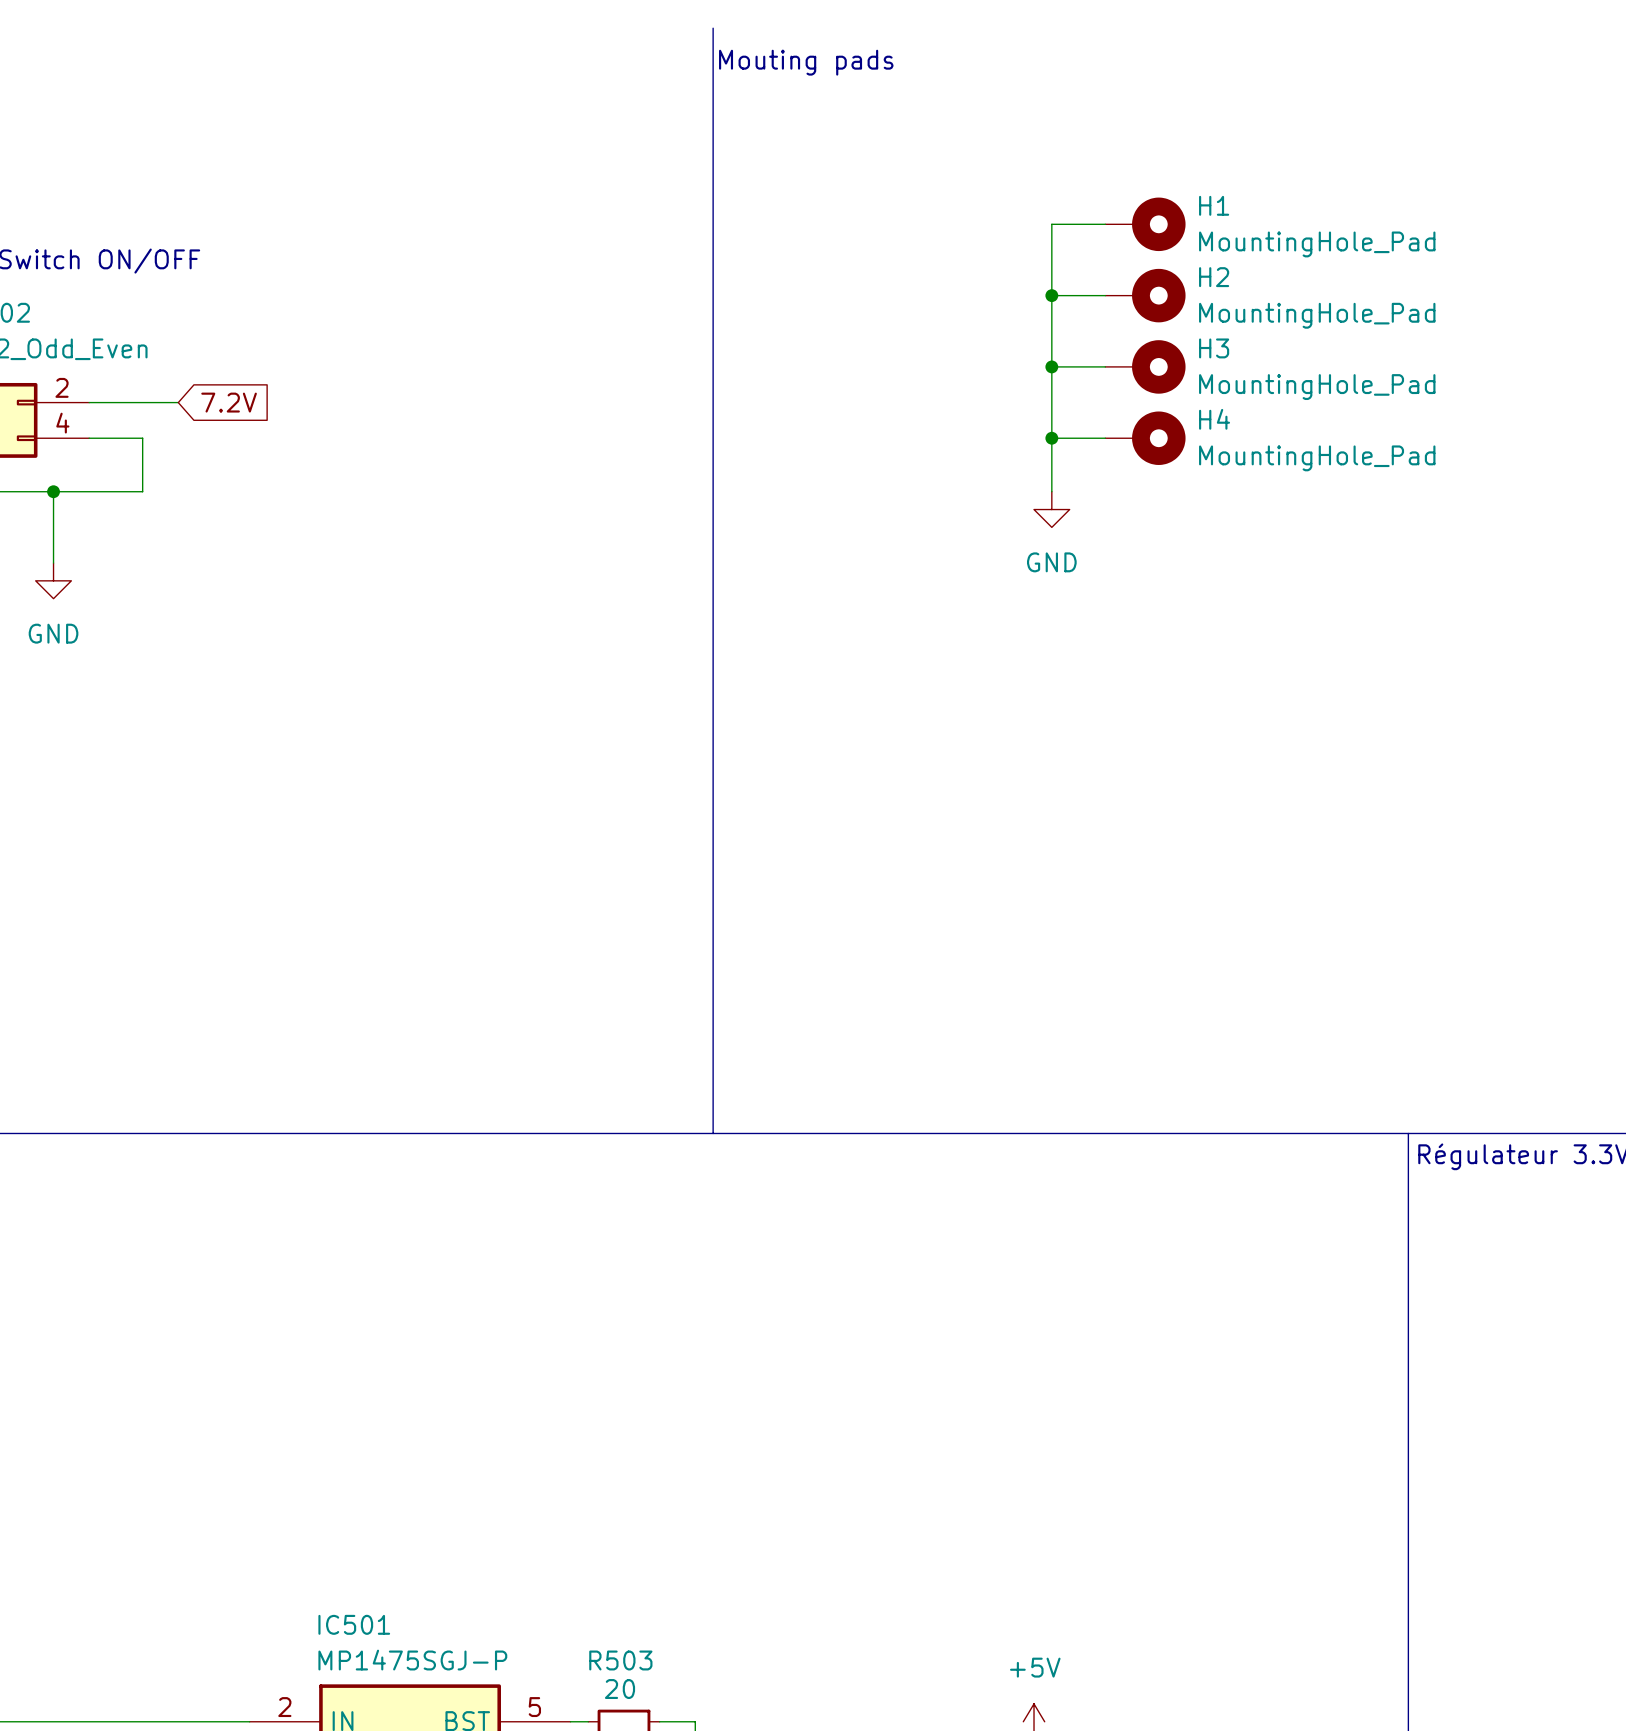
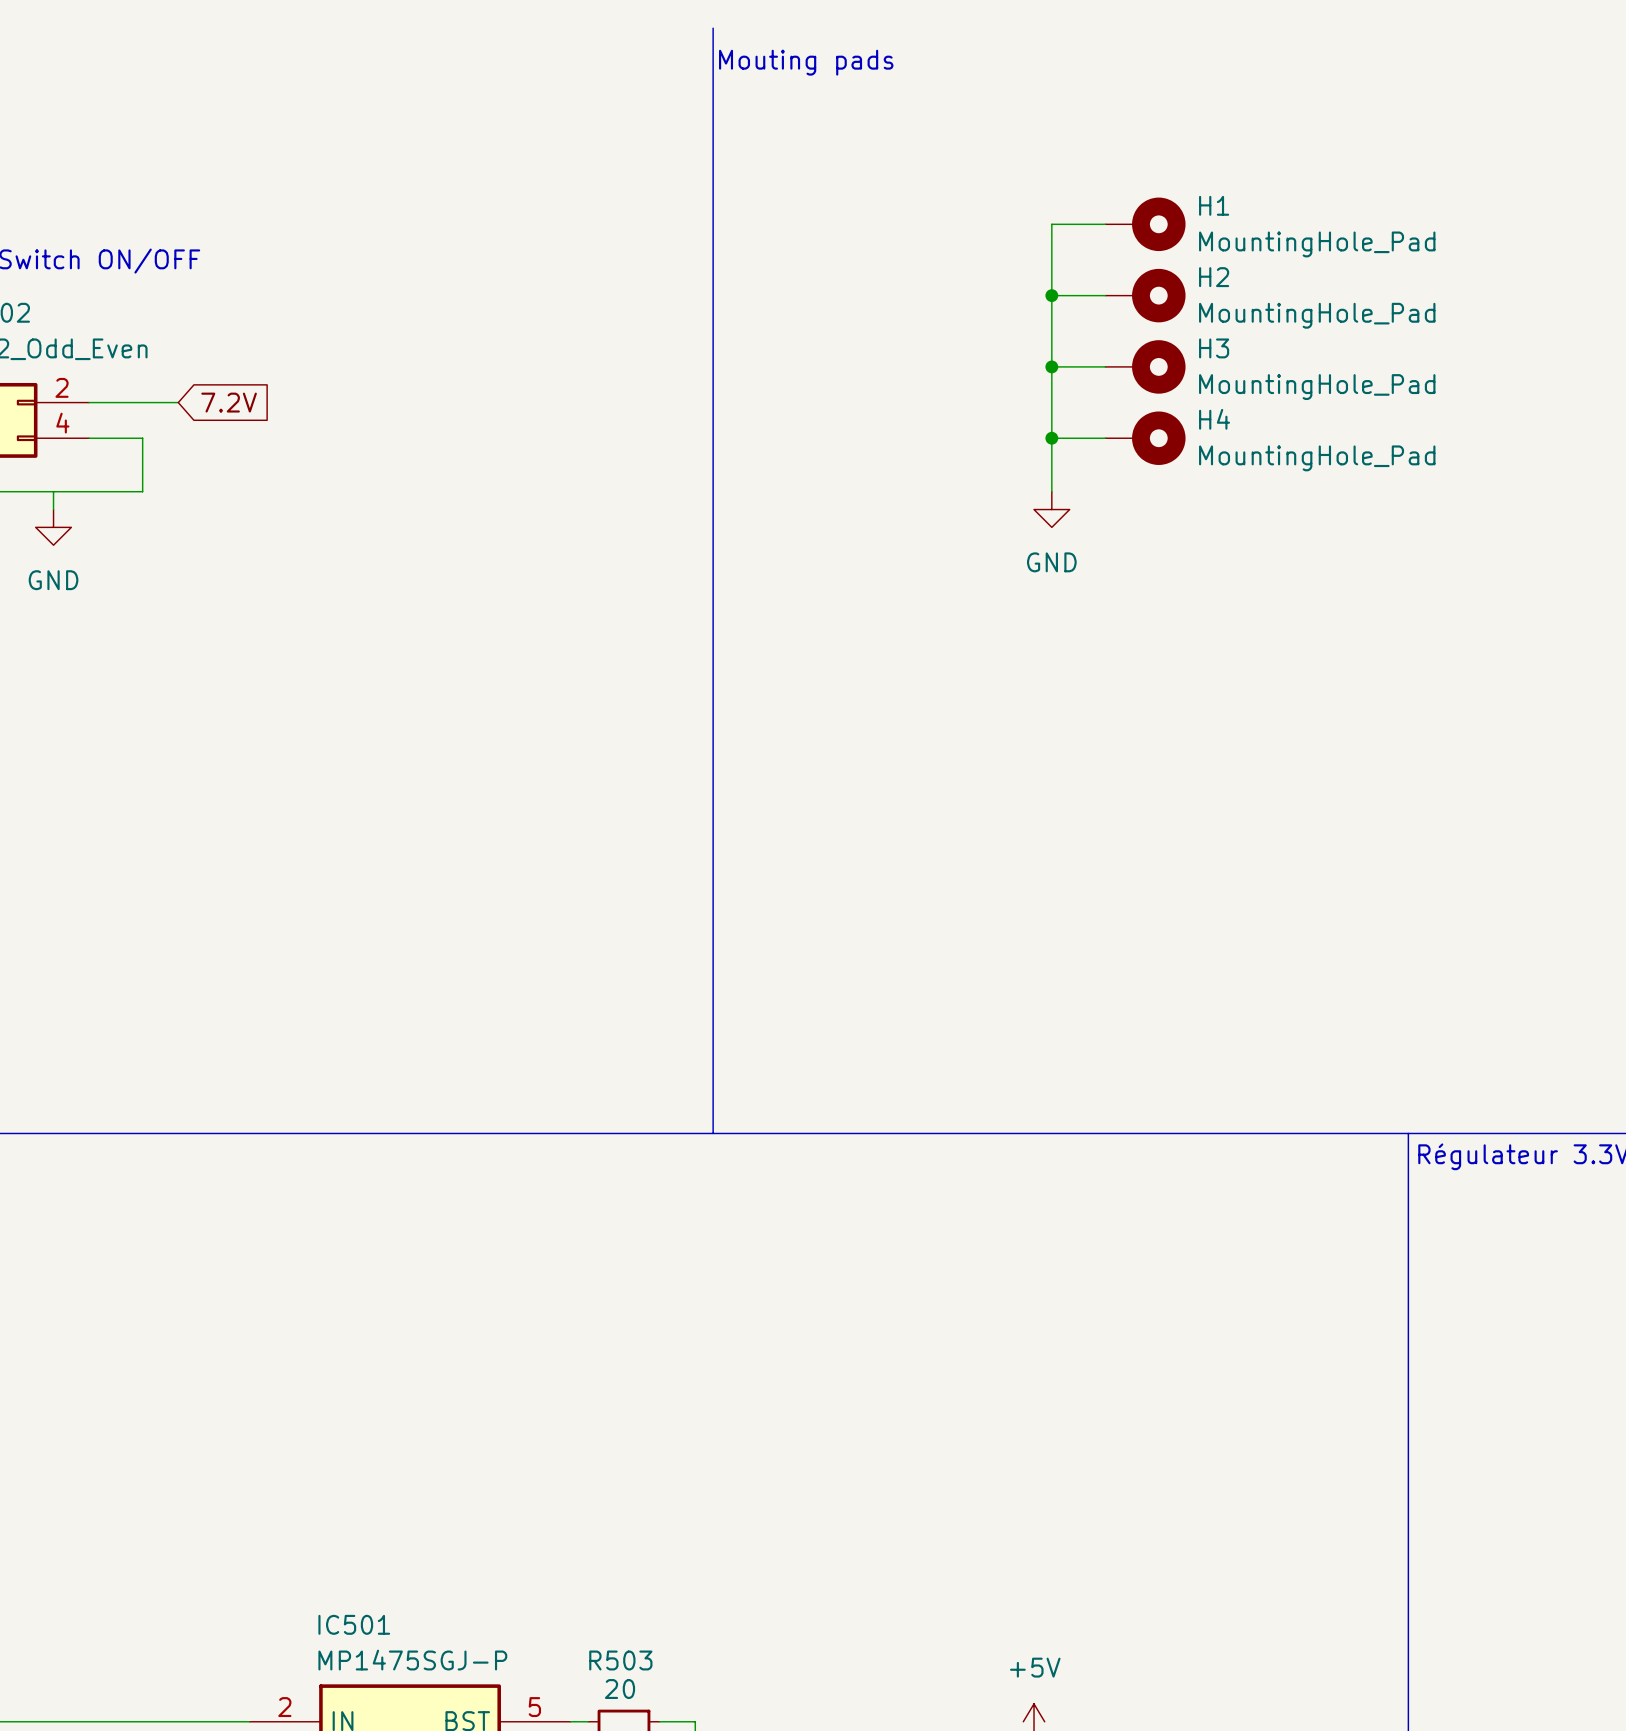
junction: (53, 491) -> none
wire: (53, 509) (53, 563) -> none
power symbol position: GND (53, 580) -> GND (53, 527)

